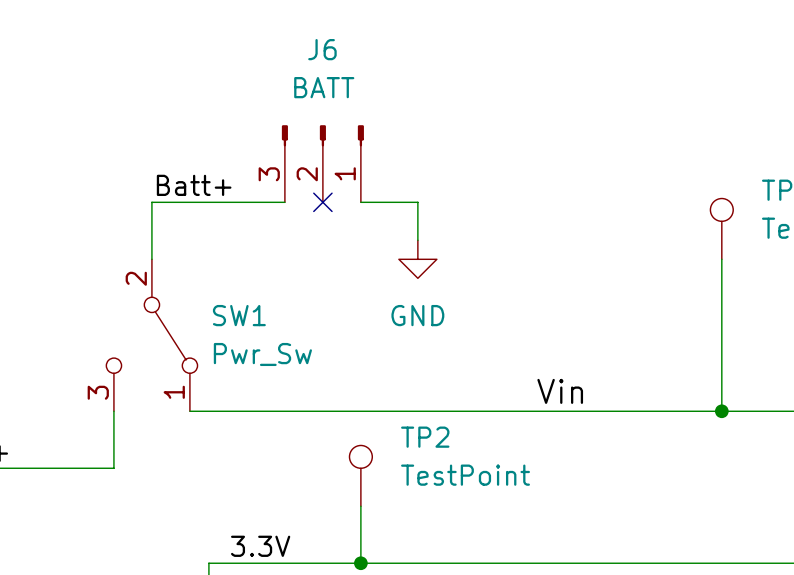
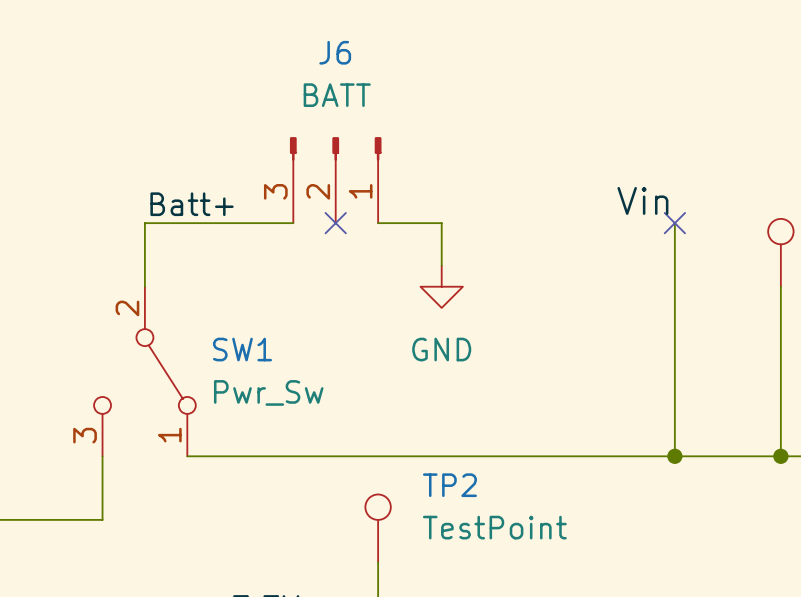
wire: none -> (674, 223) (674, 456)
no-connect mark: none -> (674, 223)
label position: Vin (560, 391) -> Vin (642, 200)
junction: none -> (674, 456)

